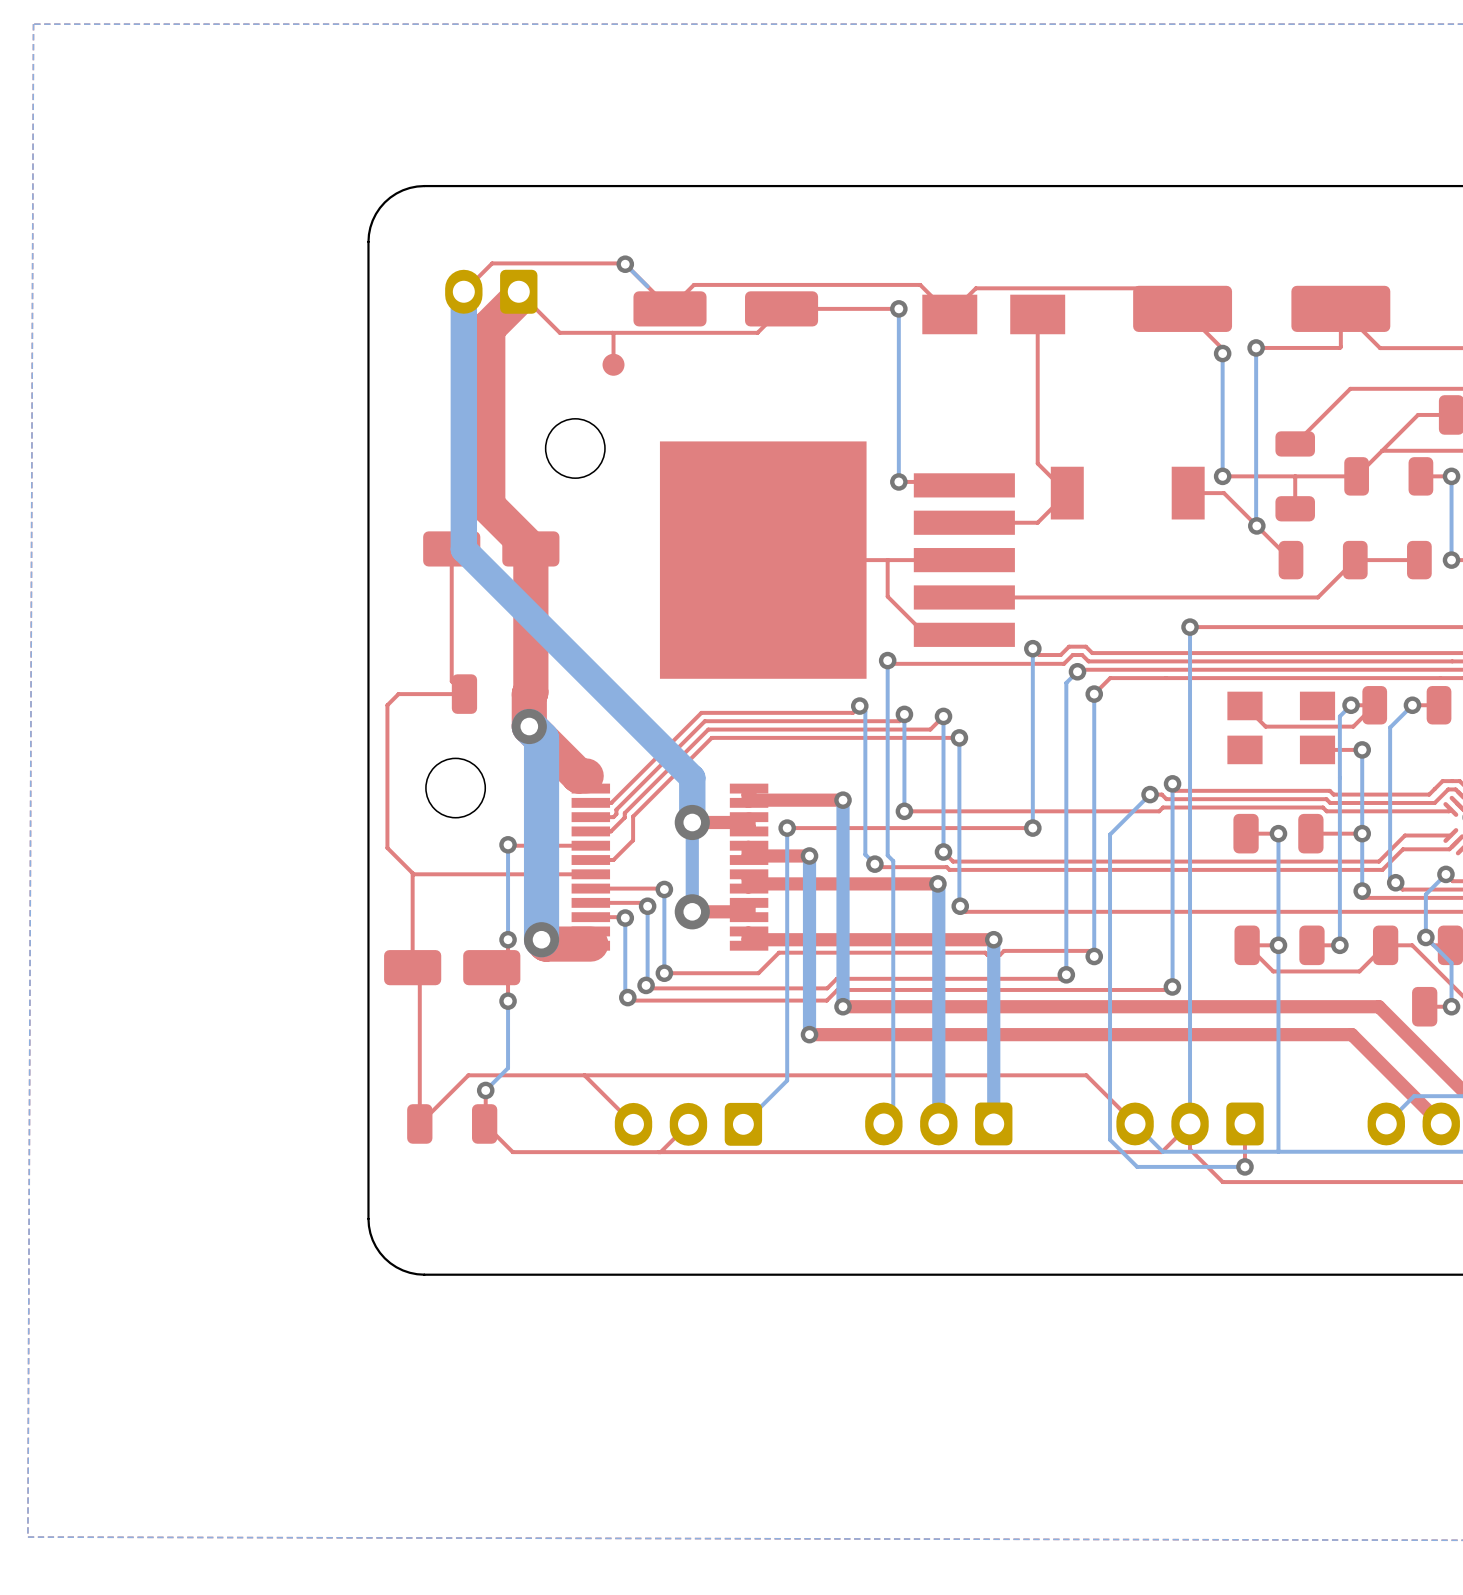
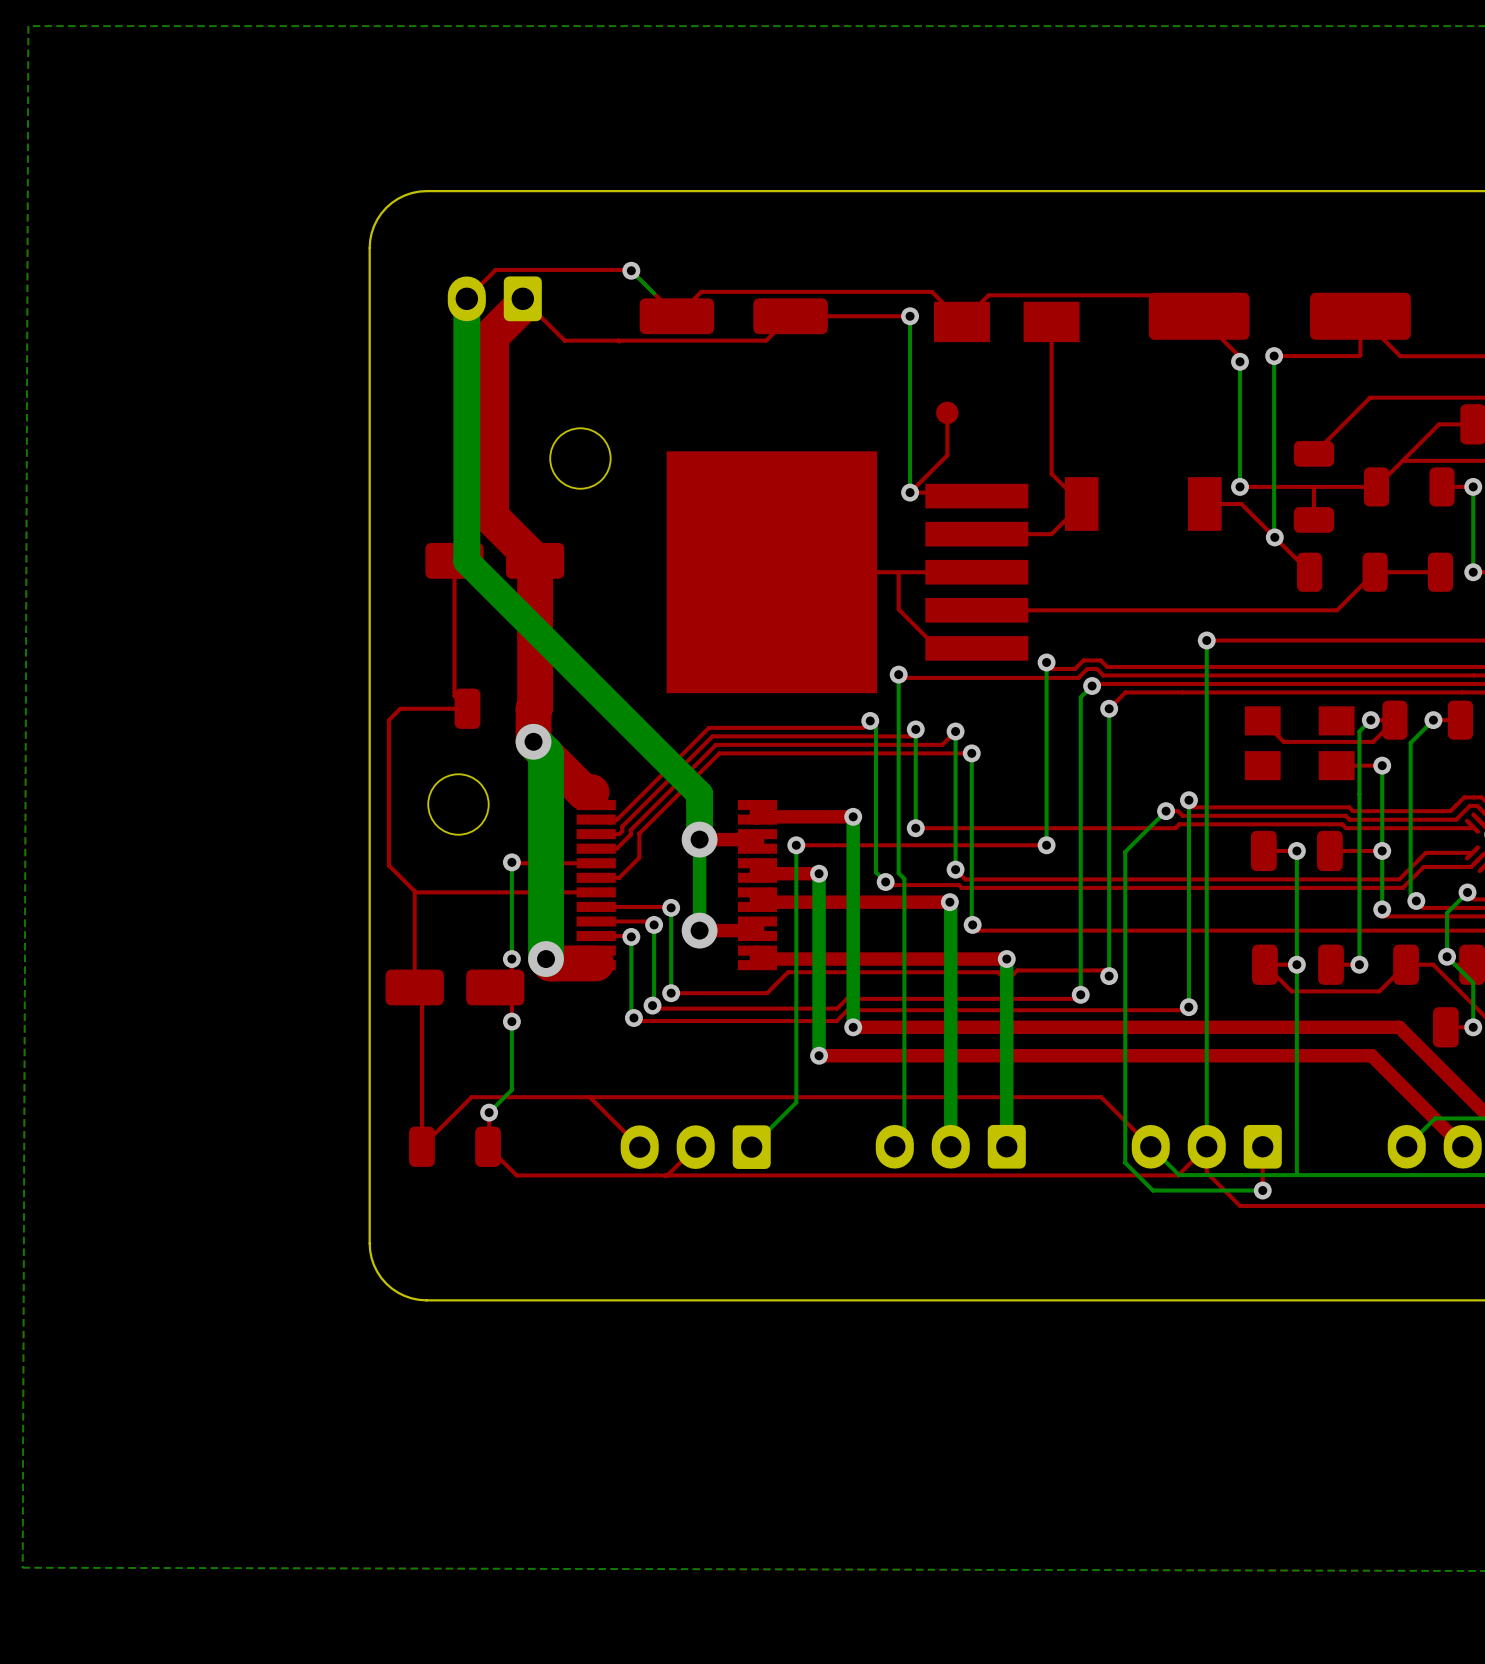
top track: (613, 333) (613, 364) -> none
part: (613, 364) -> none
top track: none -> (947, 412) (947, 455) (910, 492)
part: none -> (947, 412)

